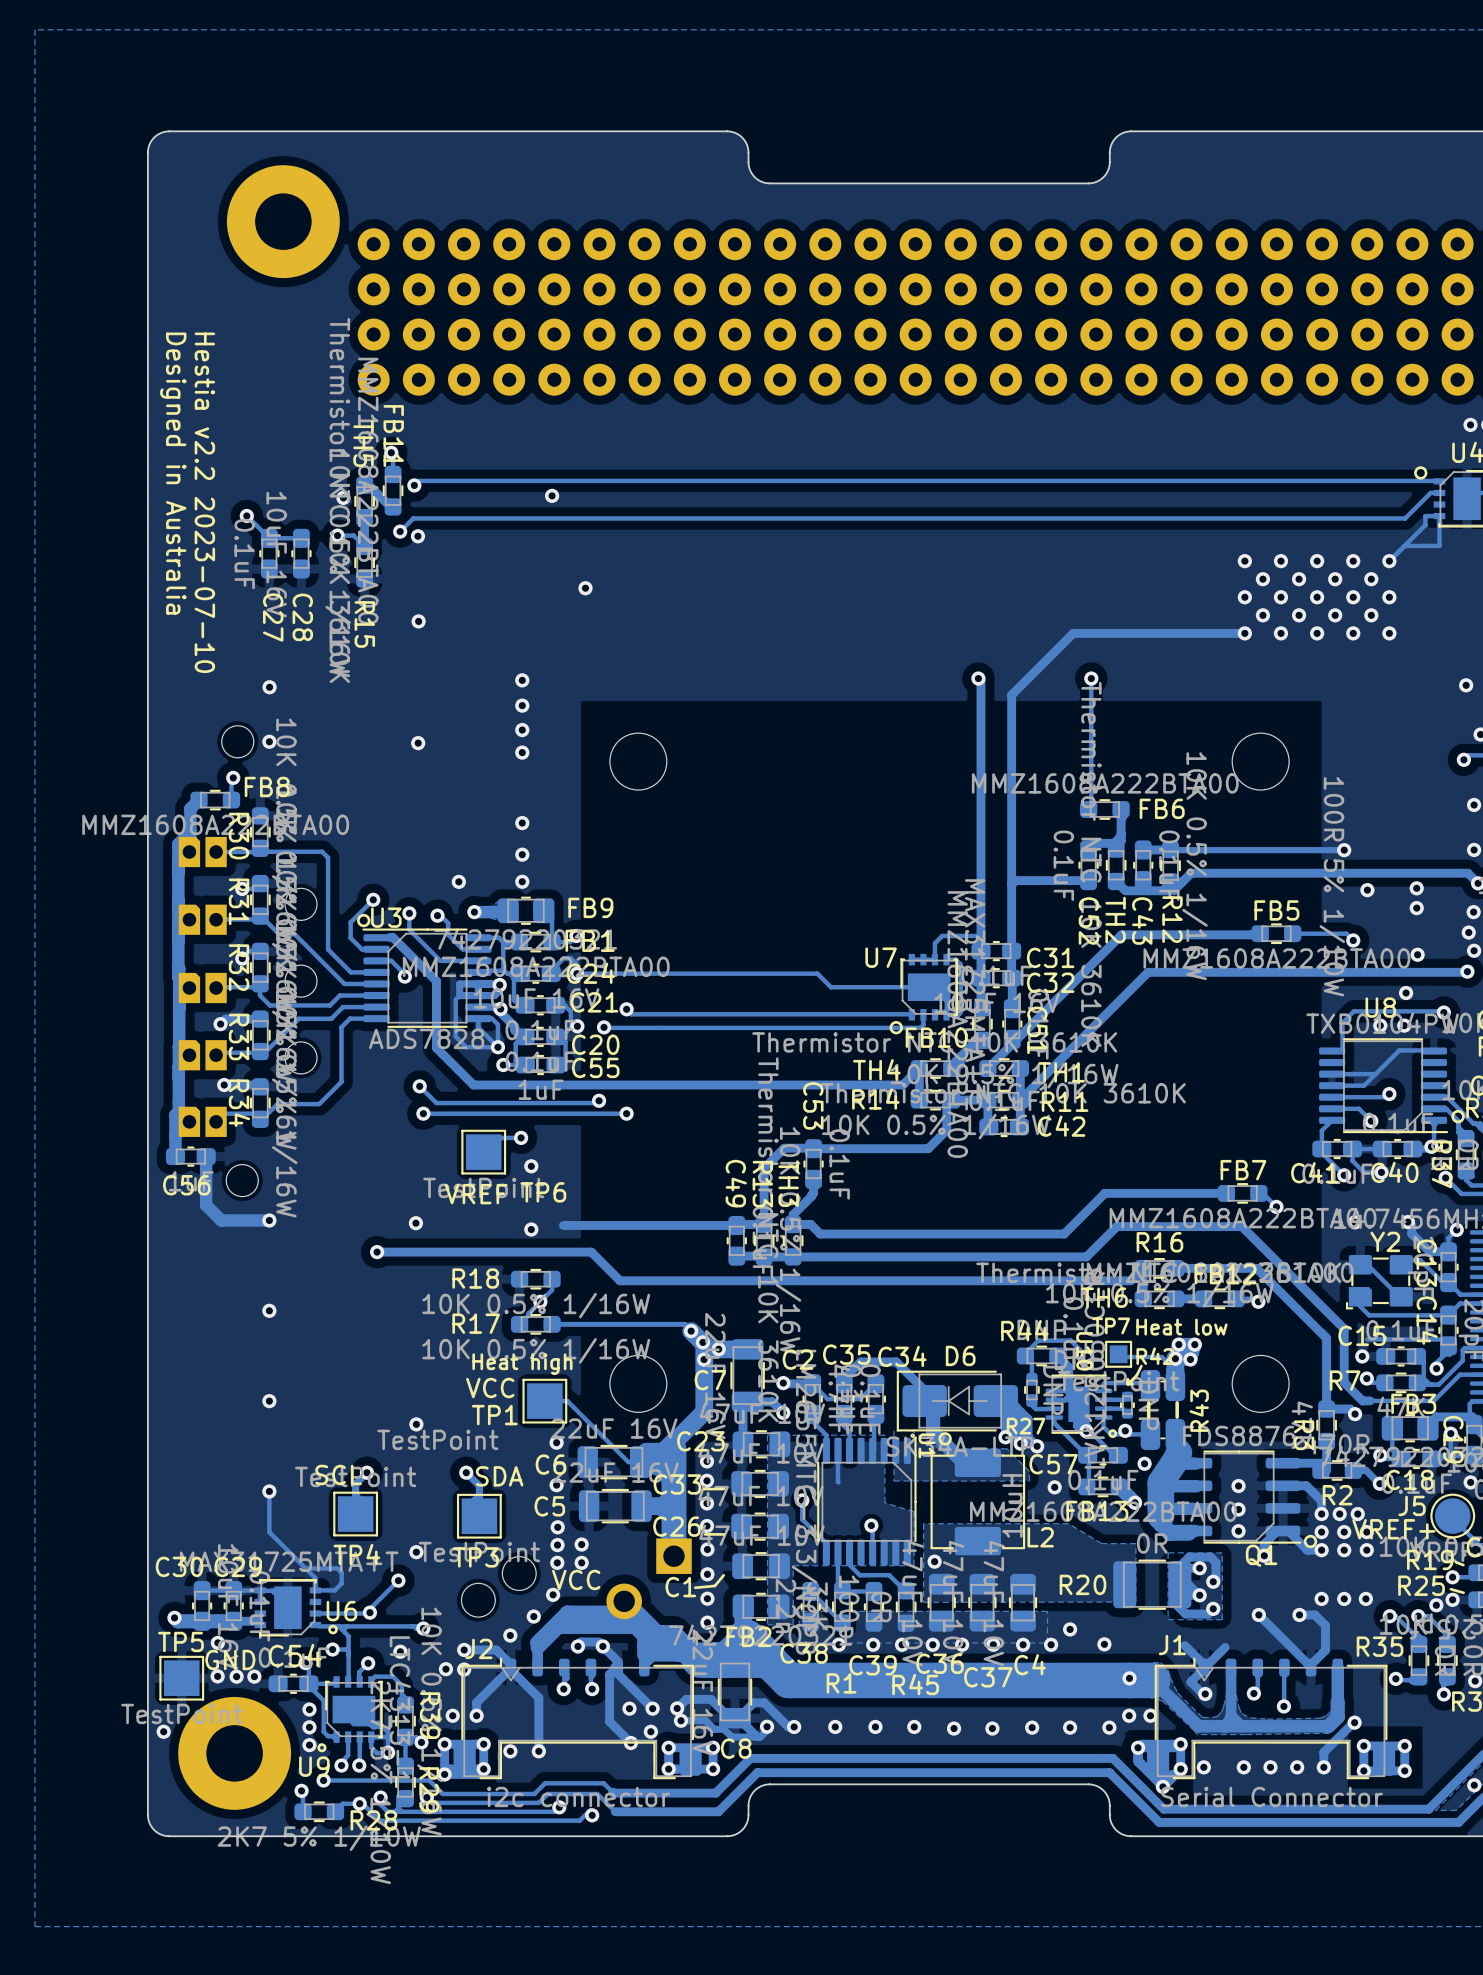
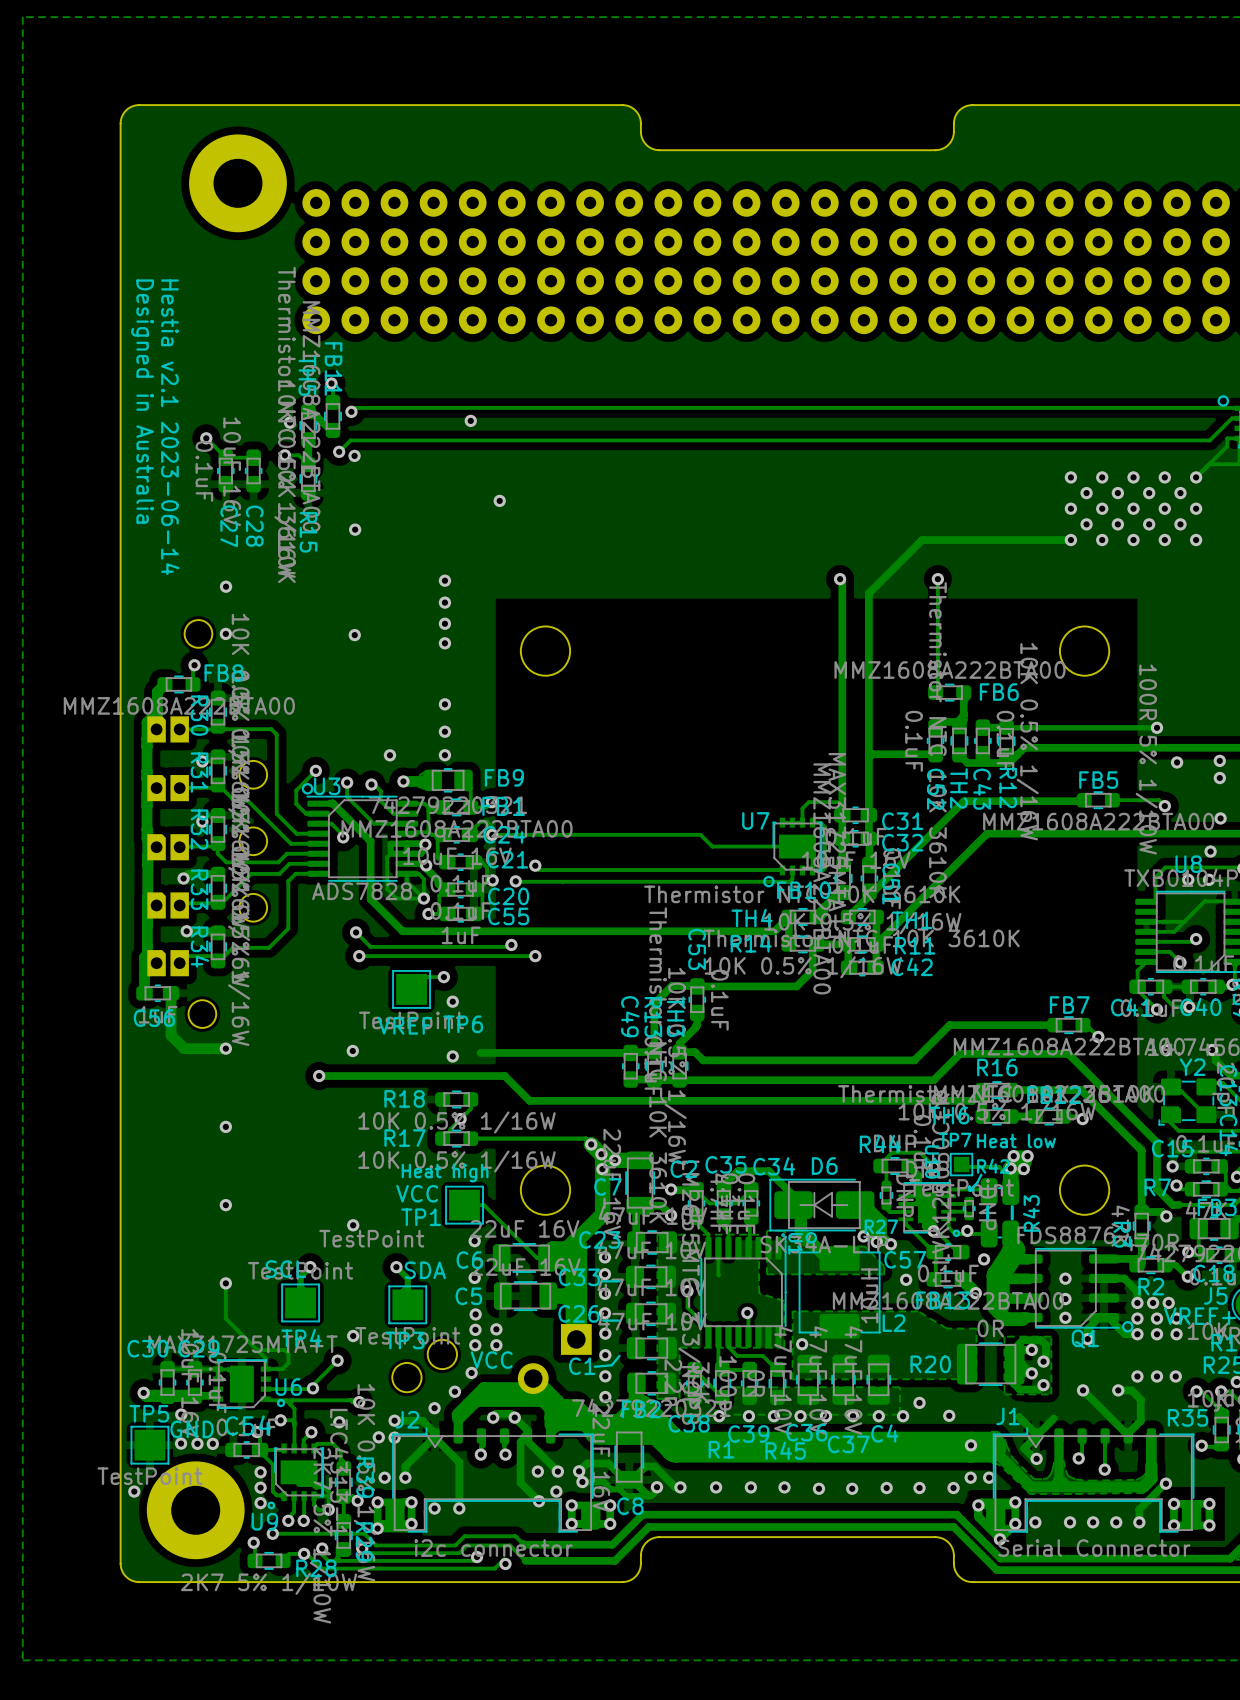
text: Hestia v2.2 2023-07-10 (204, 502) -> Hestia v2.1 2023-06-14 (170, 427)

